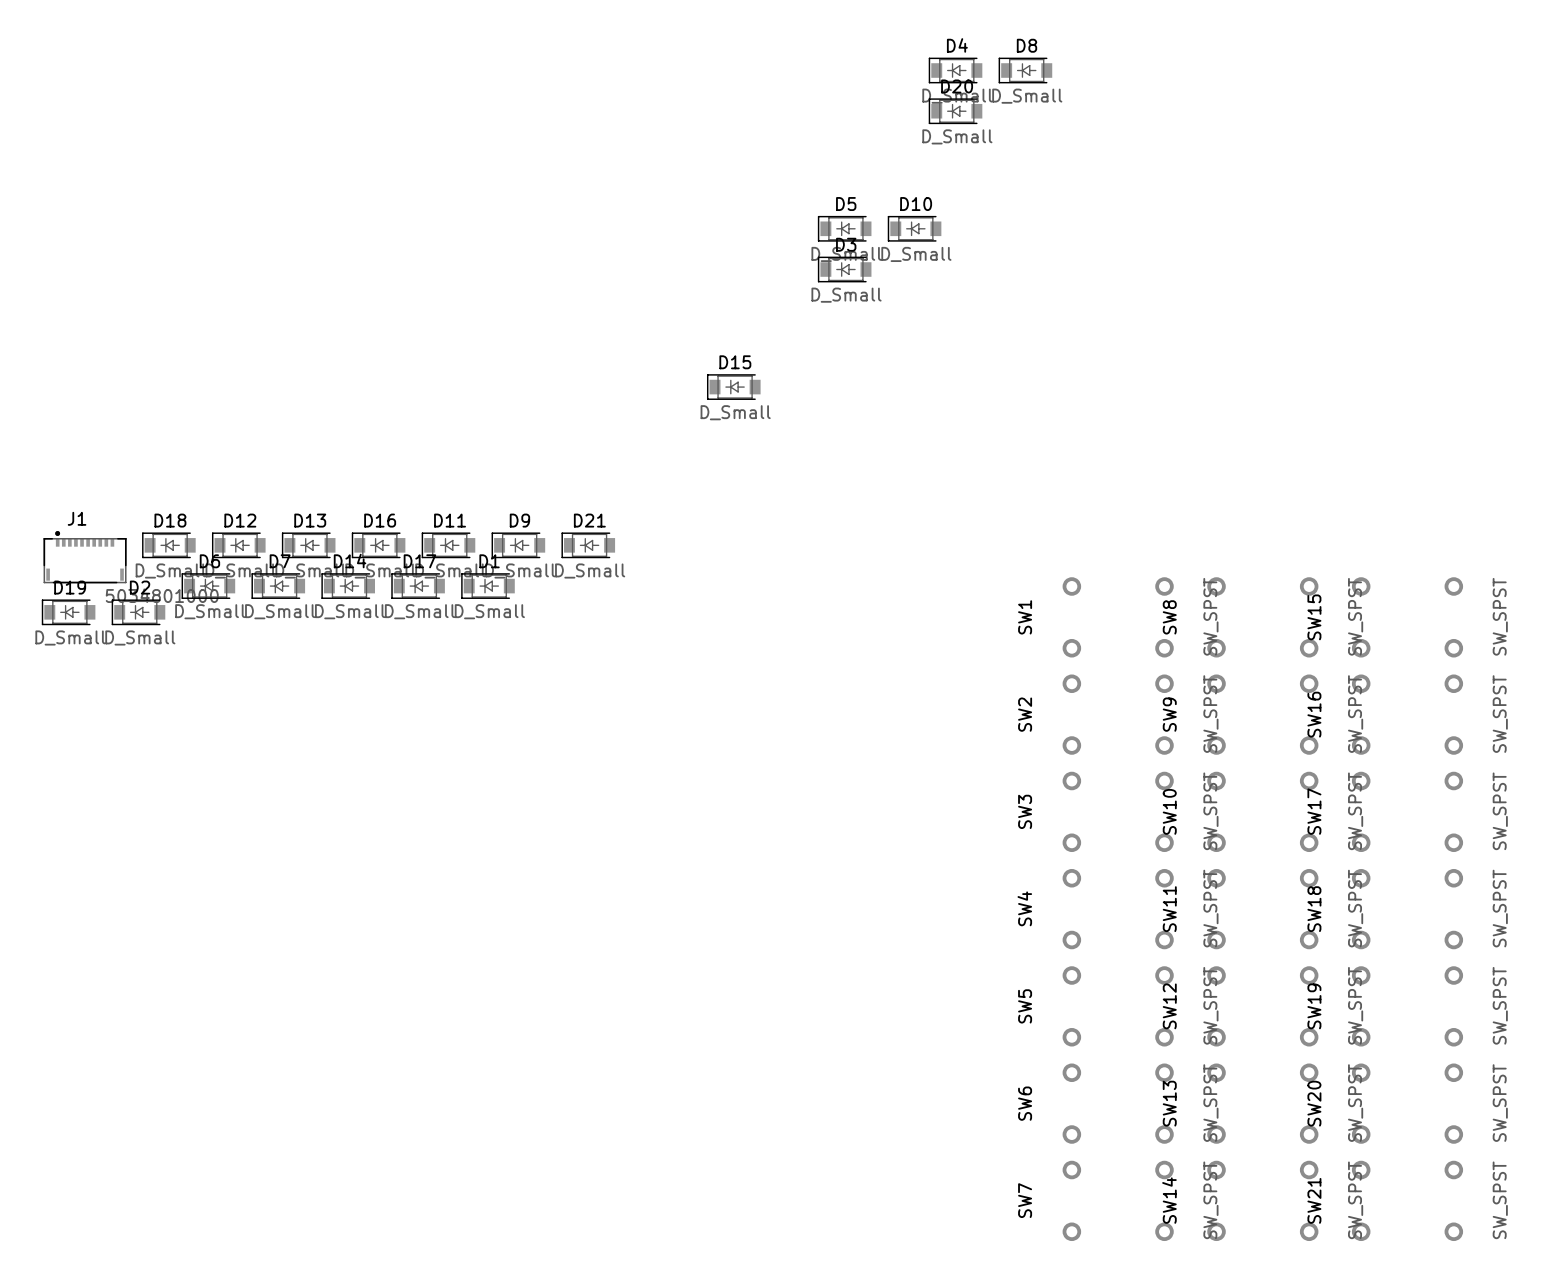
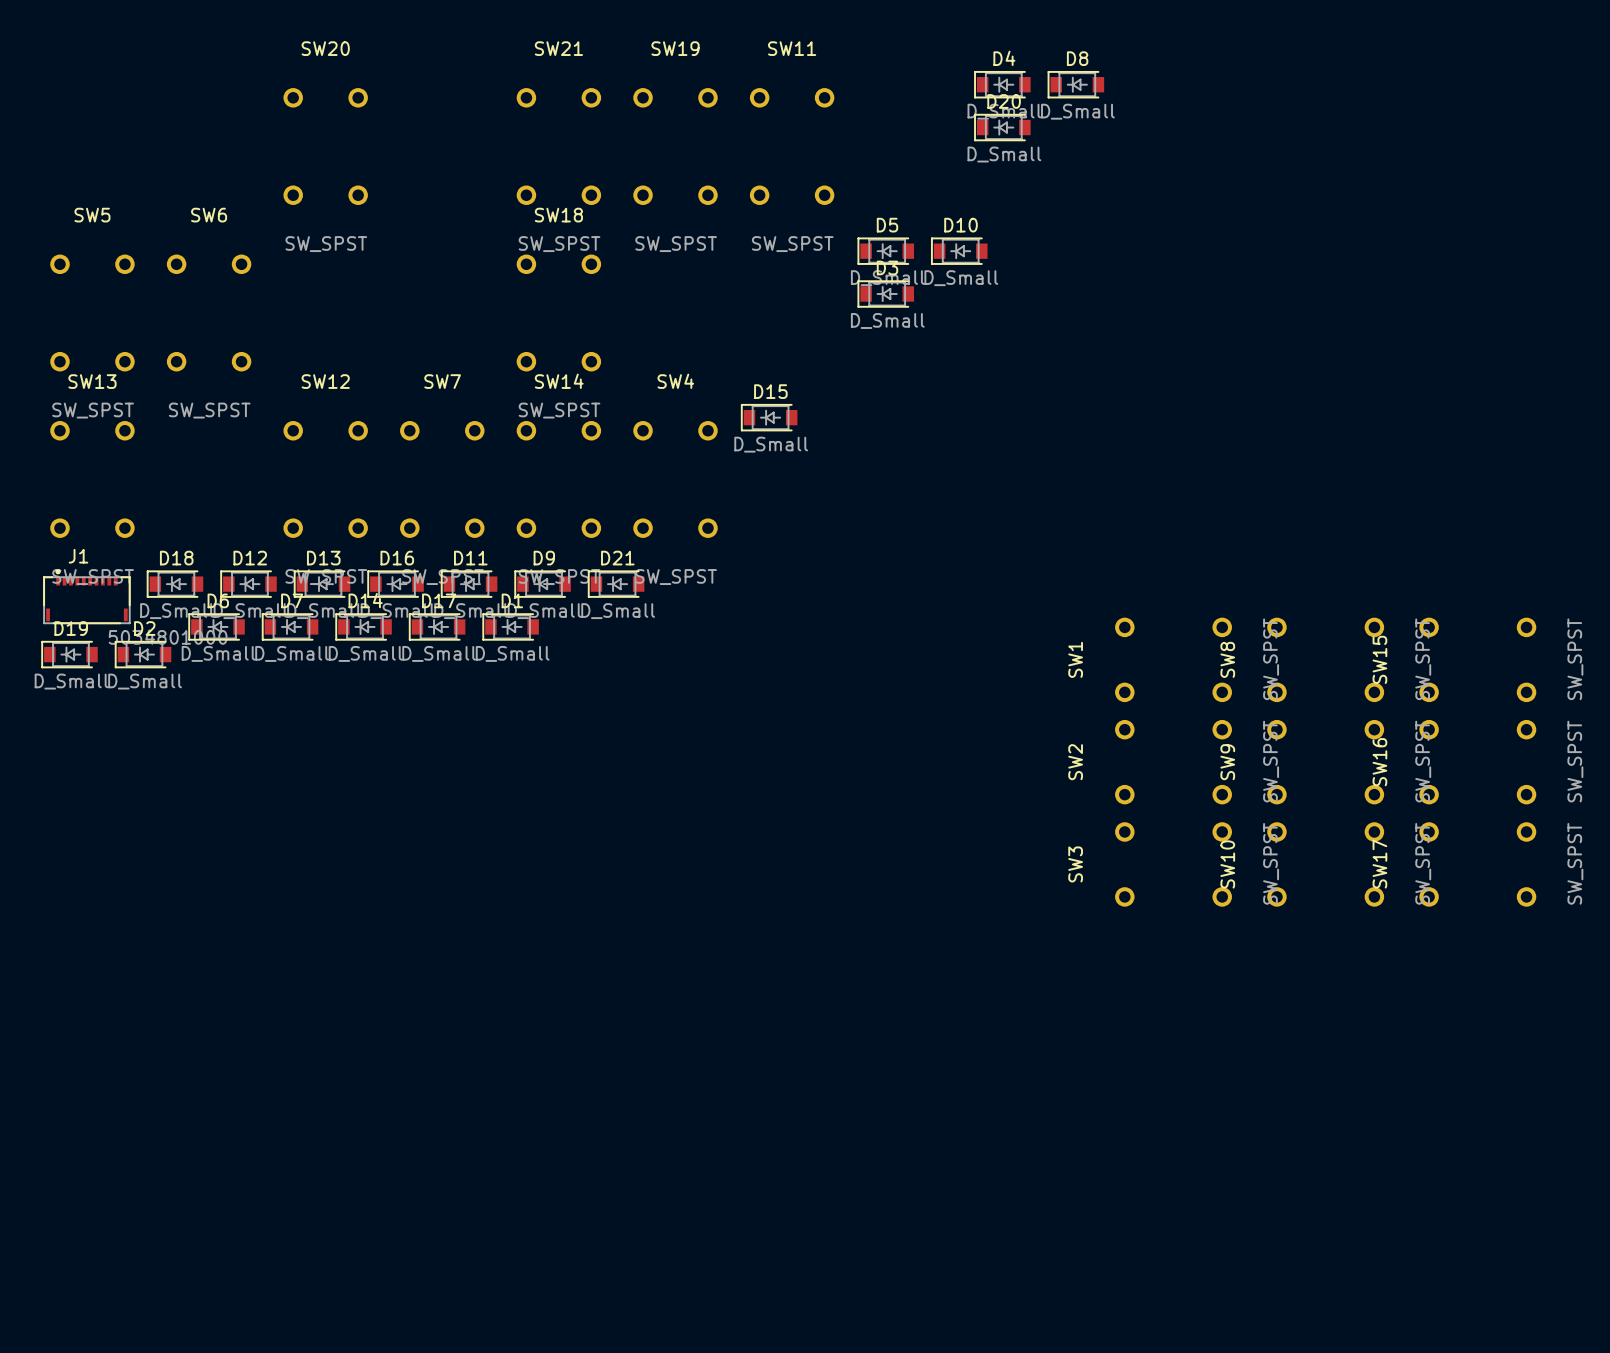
SW4 rotation: 0° (1118, 909) -> 90° clockwise (675, 479)
SW4 position: (1118, 909) -> (675, 479)
SW11 rotation: 0° (1262, 909) -> 90° clockwise (792, 146)
SW11 position: (1262, 909) -> (792, 146)
SW18 rotation: 0° (1407, 909) -> 90° clockwise (558, 313)
SW18 position: (1407, 909) -> (558, 313)
SW5 rotation: 0° (1118, 1006) -> 90° clockwise (92, 313)
SW5 position: (1118, 1006) -> (92, 313)
SW12 rotation: 0° (1262, 1006) -> 90° clockwise (325, 479)
SW12 position: (1262, 1006) -> (325, 479)
SW19 rotation: 0° (1407, 1006) -> 90° clockwise (675, 146)
SW19 position: (1407, 1006) -> (675, 146)
SW6 rotation: 0° (1118, 1103) -> 90° clockwise (209, 313)
SW6 position: (1118, 1103) -> (209, 313)
SW13 rotation: 0° (1262, 1103) -> 90° clockwise (92, 479)
SW13 position: (1262, 1103) -> (92, 479)
SW20 rotation: 0° (1407, 1103) -> 90° clockwise (325, 146)
SW20 position: (1407, 1103) -> (325, 146)
SW7 rotation: 0° (1118, 1200) -> 90° clockwise (442, 479)
SW7 position: (1118, 1200) -> (442, 479)
SW14 rotation: 0° (1262, 1200) -> 90° clockwise (558, 479)
SW14 position: (1262, 1200) -> (558, 479)
SW21 rotation: 0° (1407, 1200) -> 90° clockwise (558, 146)
SW21 position: (1407, 1200) -> (558, 146)

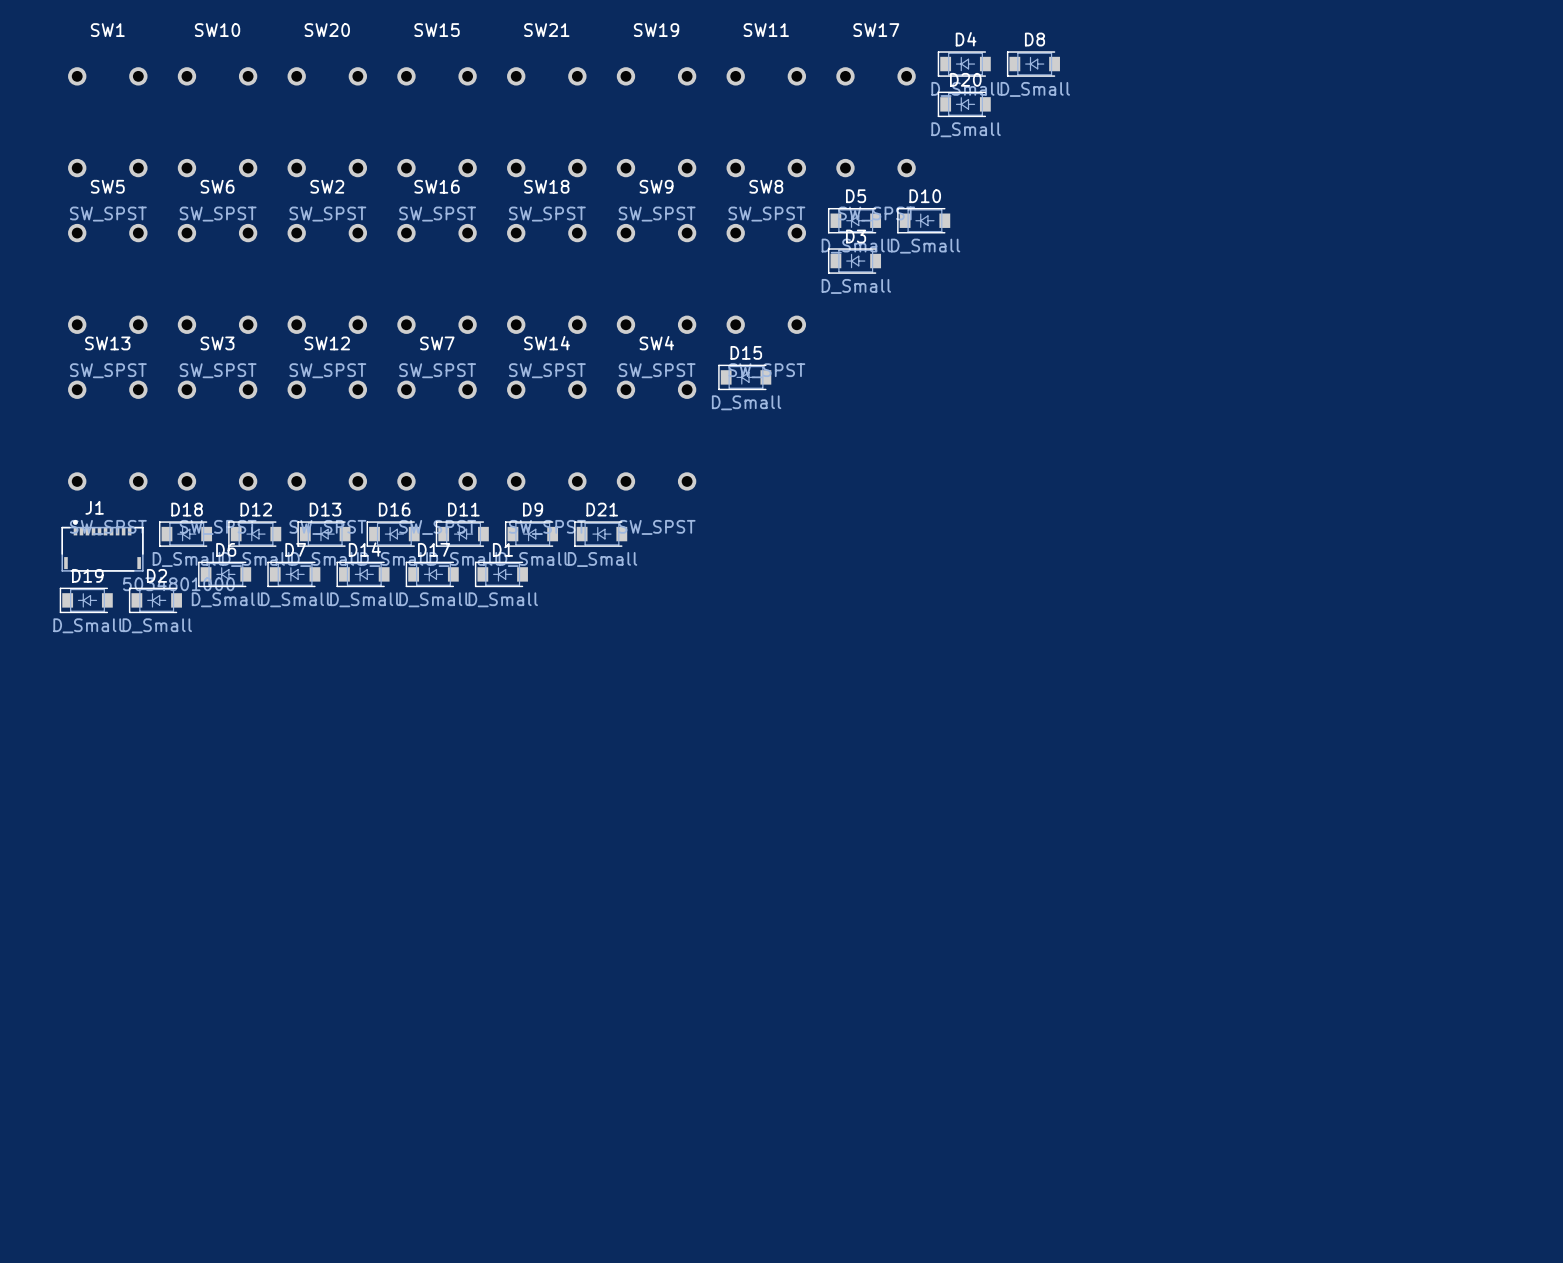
SW1 rotation: 0° (1173, 659) -> 90° clockwise (107, 122)
SW1 position: (1173, 659) -> (107, 122)
SW8 rotation: 0° (1325, 659) -> 90° clockwise (766, 278)
SW8 position: (1325, 659) -> (766, 278)
SW15 rotation: 0° (1477, 659) -> 90° clockwise (437, 122)
SW15 position: (1477, 659) -> (437, 122)
SW2 rotation: 0° (1173, 762) -> 90° clockwise (327, 278)
SW2 position: (1173, 762) -> (327, 278)
SW9 rotation: 0° (1325, 762) -> 90° clockwise (656, 278)
SW9 position: (1325, 762) -> (656, 278)
SW16 rotation: 0° (1477, 762) -> 90° clockwise (437, 278)
SW16 position: (1477, 762) -> (437, 278)
SW3 rotation: 0° (1173, 864) -> 90° clockwise (217, 435)
SW3 position: (1173, 864) -> (217, 435)
SW10 rotation: 0° (1325, 864) -> 90° clockwise (217, 122)
SW10 position: (1325, 864) -> (217, 122)
SW17 rotation: 0° (1477, 864) -> 90° clockwise (876, 122)
SW17 position: (1477, 864) -> (876, 122)

